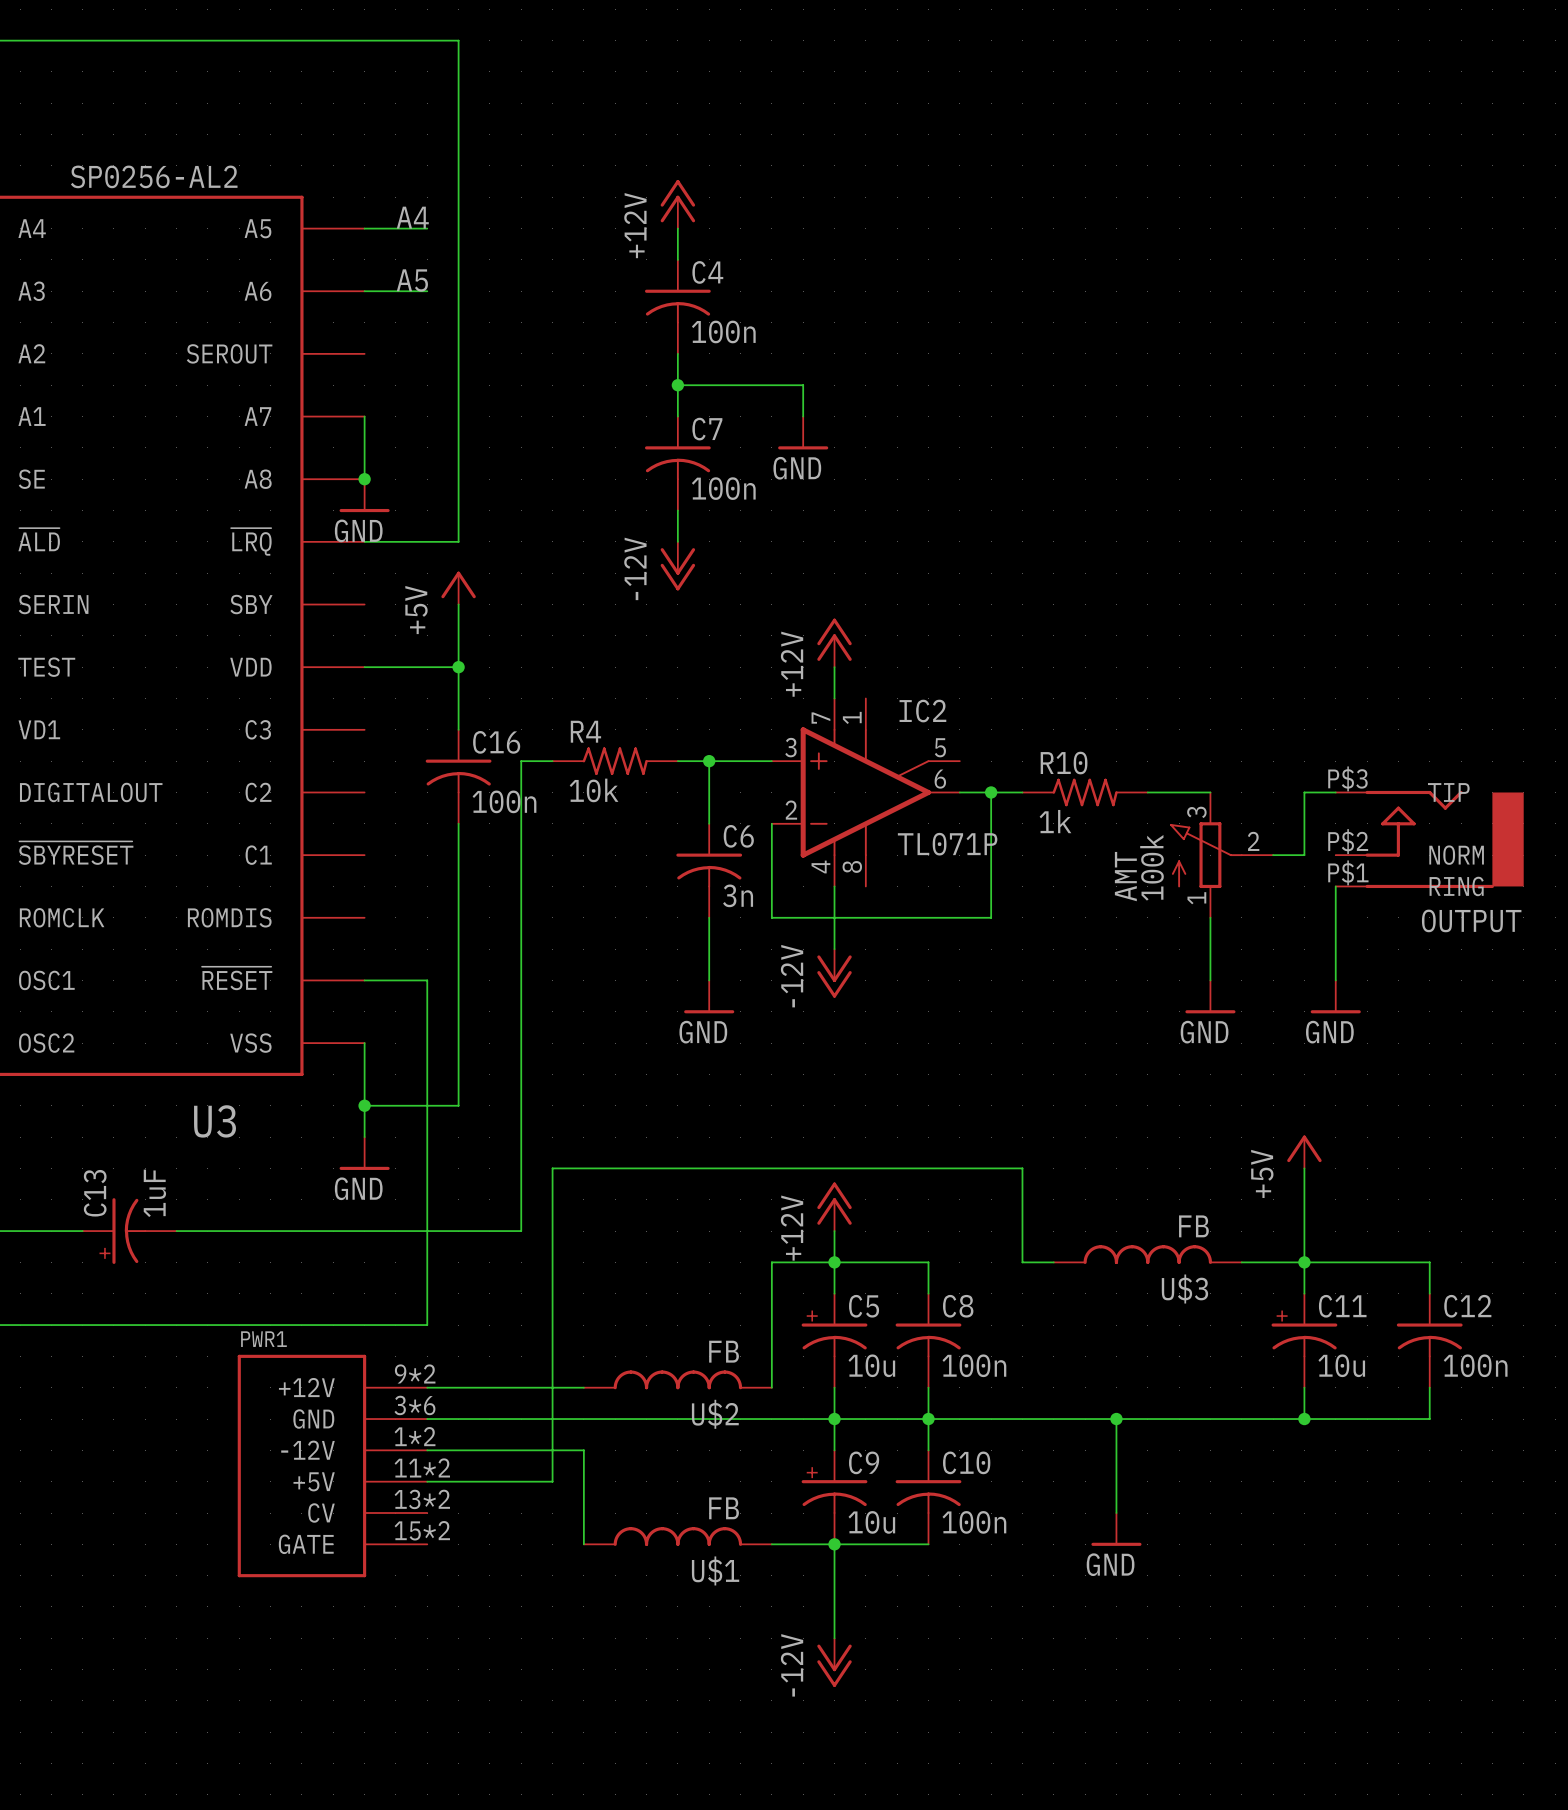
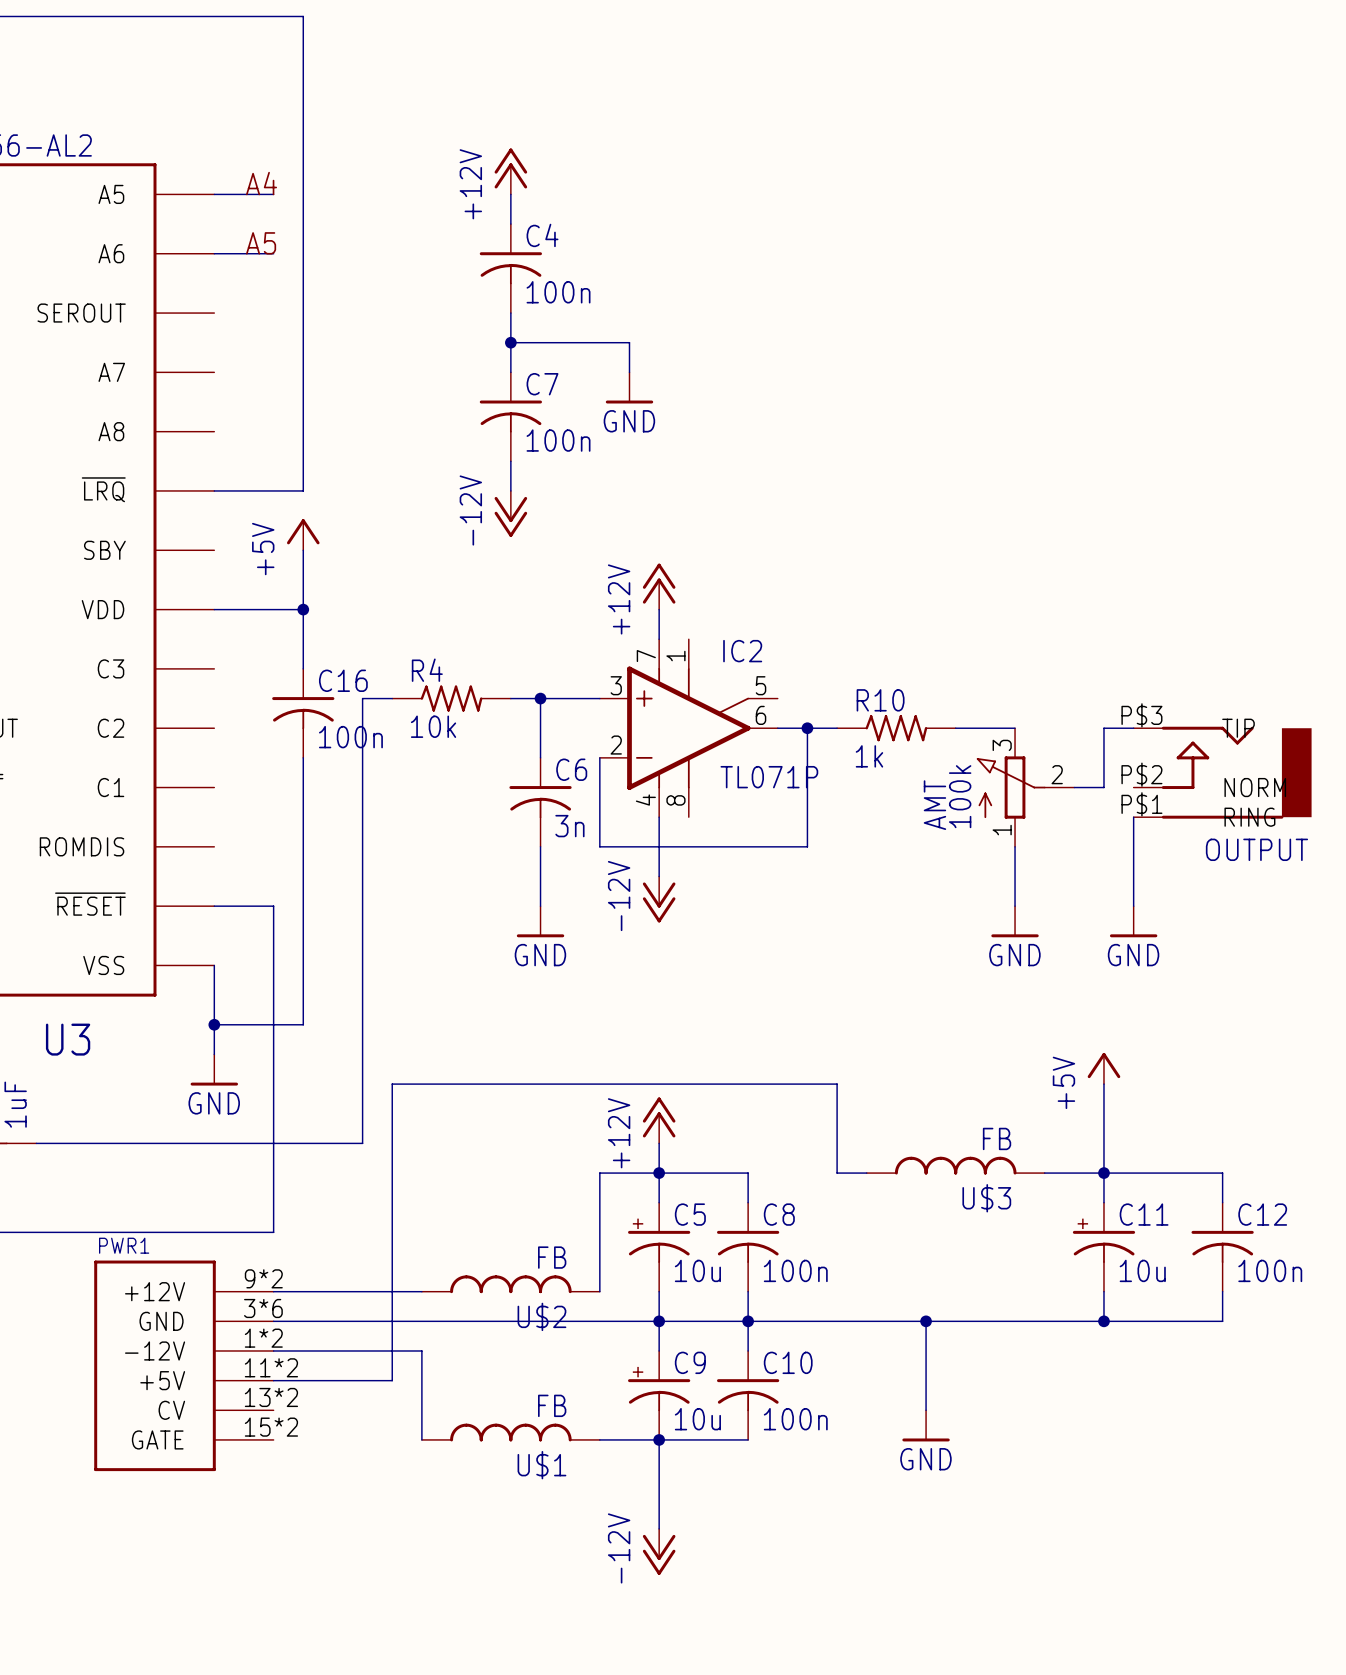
wire: (364, 416) (364, 479) -> none
junction: (364, 479) -> none
power symbol: GND (364, 495) -> none

